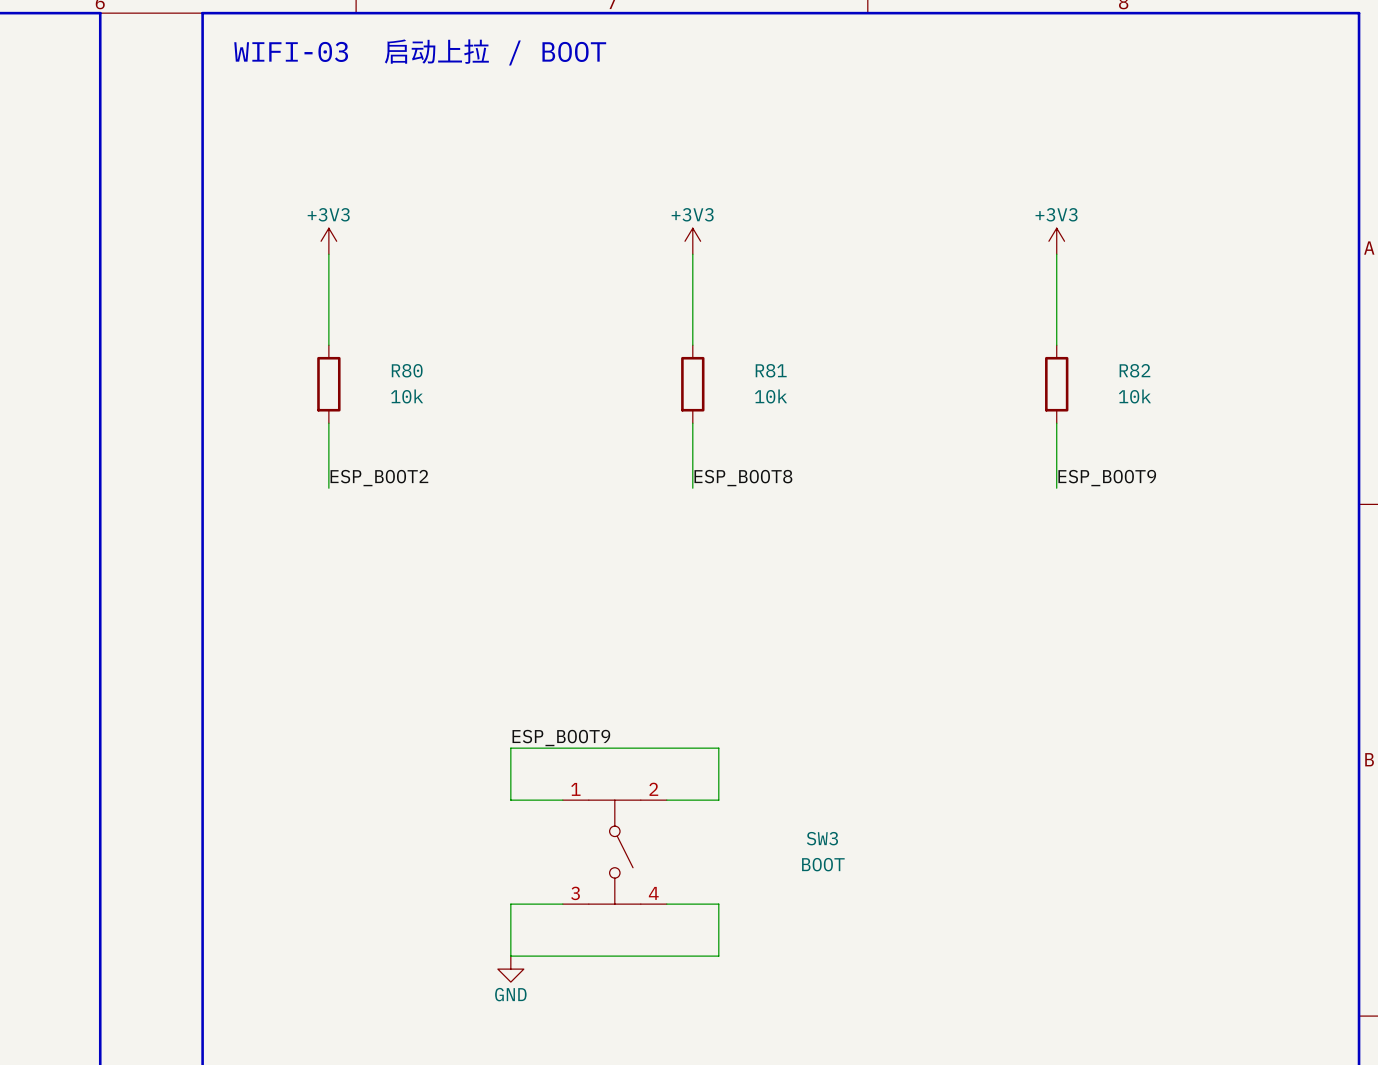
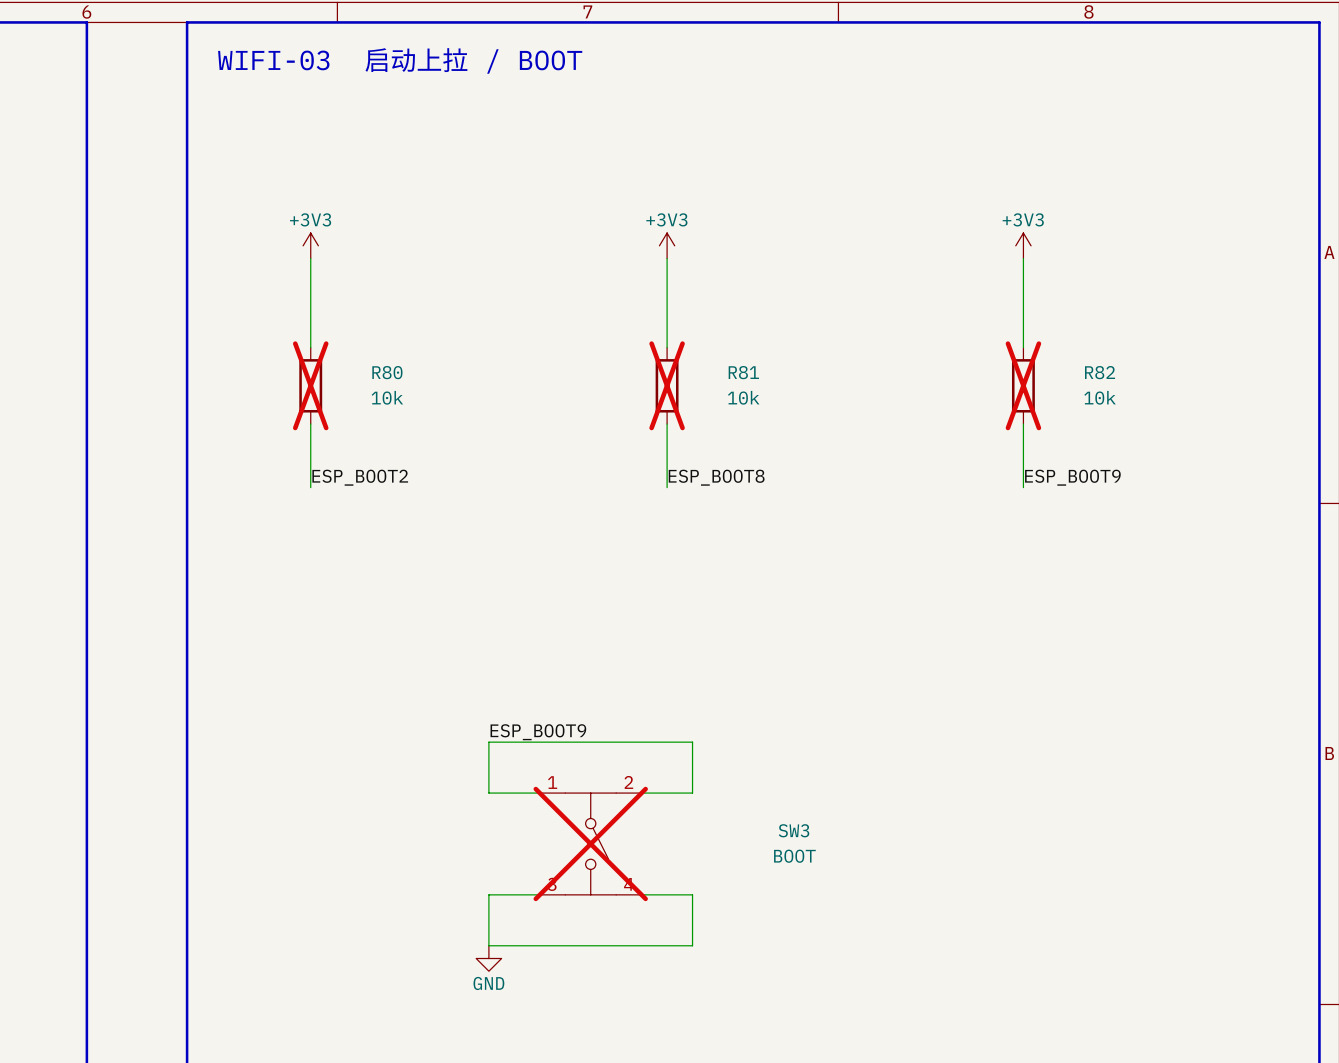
R80 do-not-place cross: none -> (310, 385)
R81 do-not-place cross: none -> (667, 385)
R82 do-not-place cross: none -> (1023, 385)
SW3 do-not-place cross: none -> (590, 843)

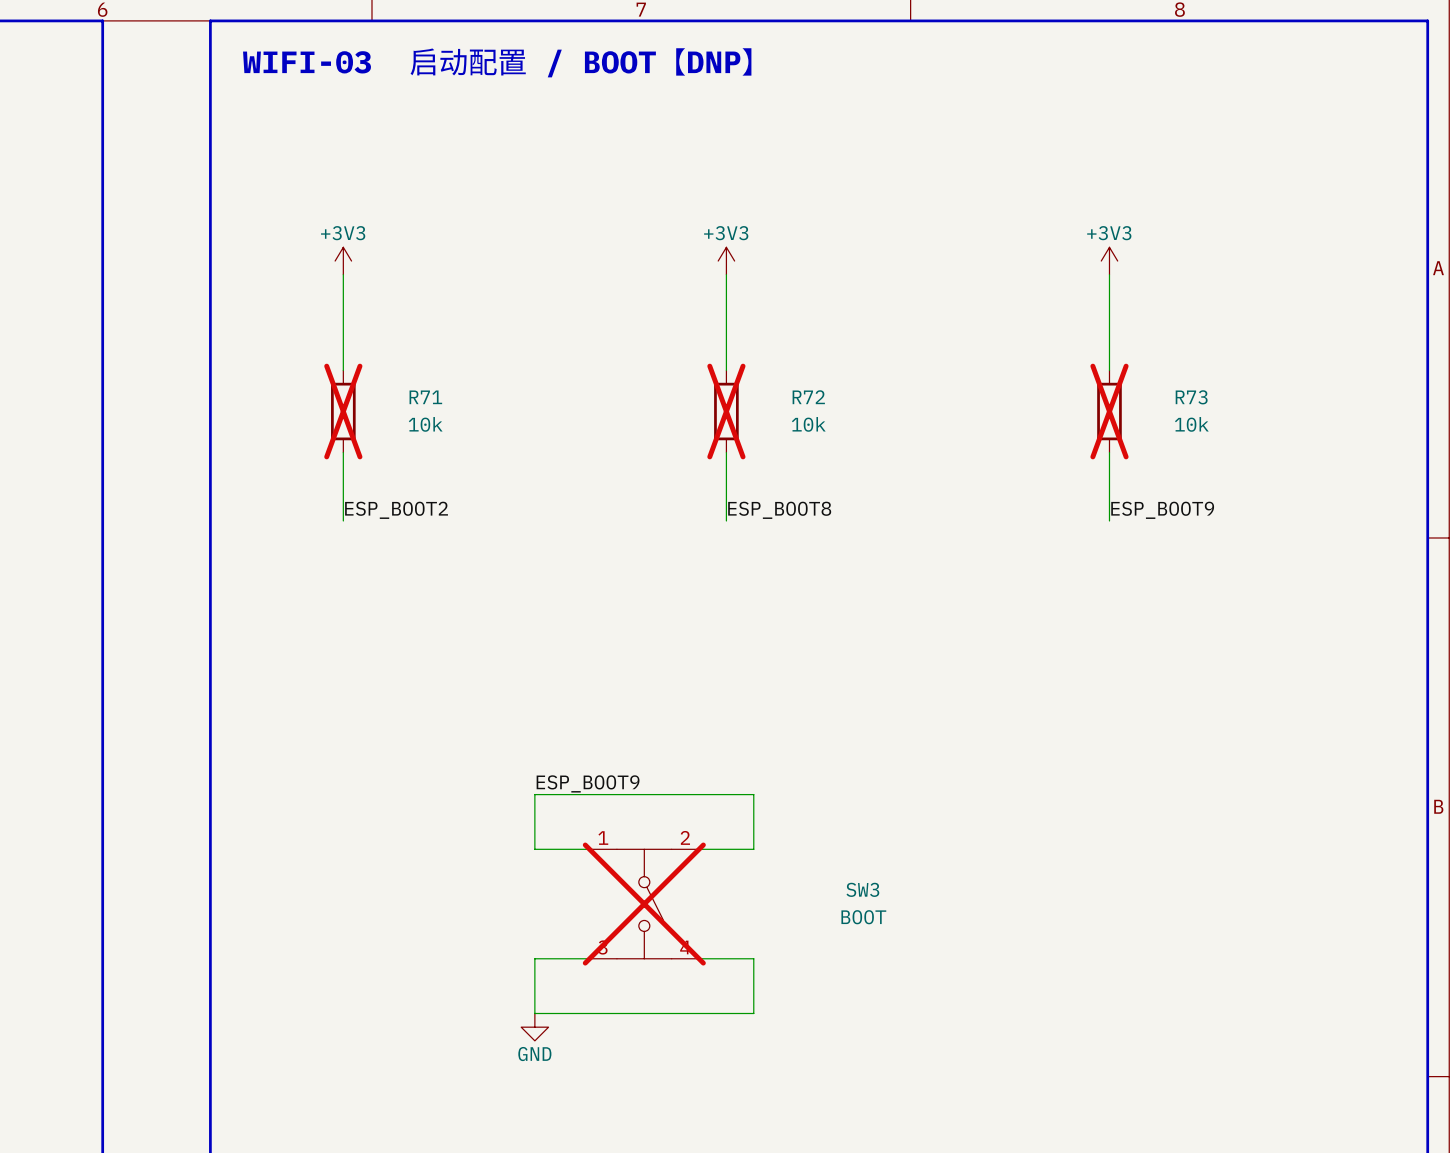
text: WIFI-03 启动上拉 / BOOT (400, 60) -> WIFI-03 启动配置 / BOOT【DNP】 (497, 62)
R80 name: R80 (387, 372) -> R71 (425, 397)
R81 name: R81 (743, 372) -> R72 (808, 397)
R82 name: R82 (1100, 372) -> R73 (1191, 397)

